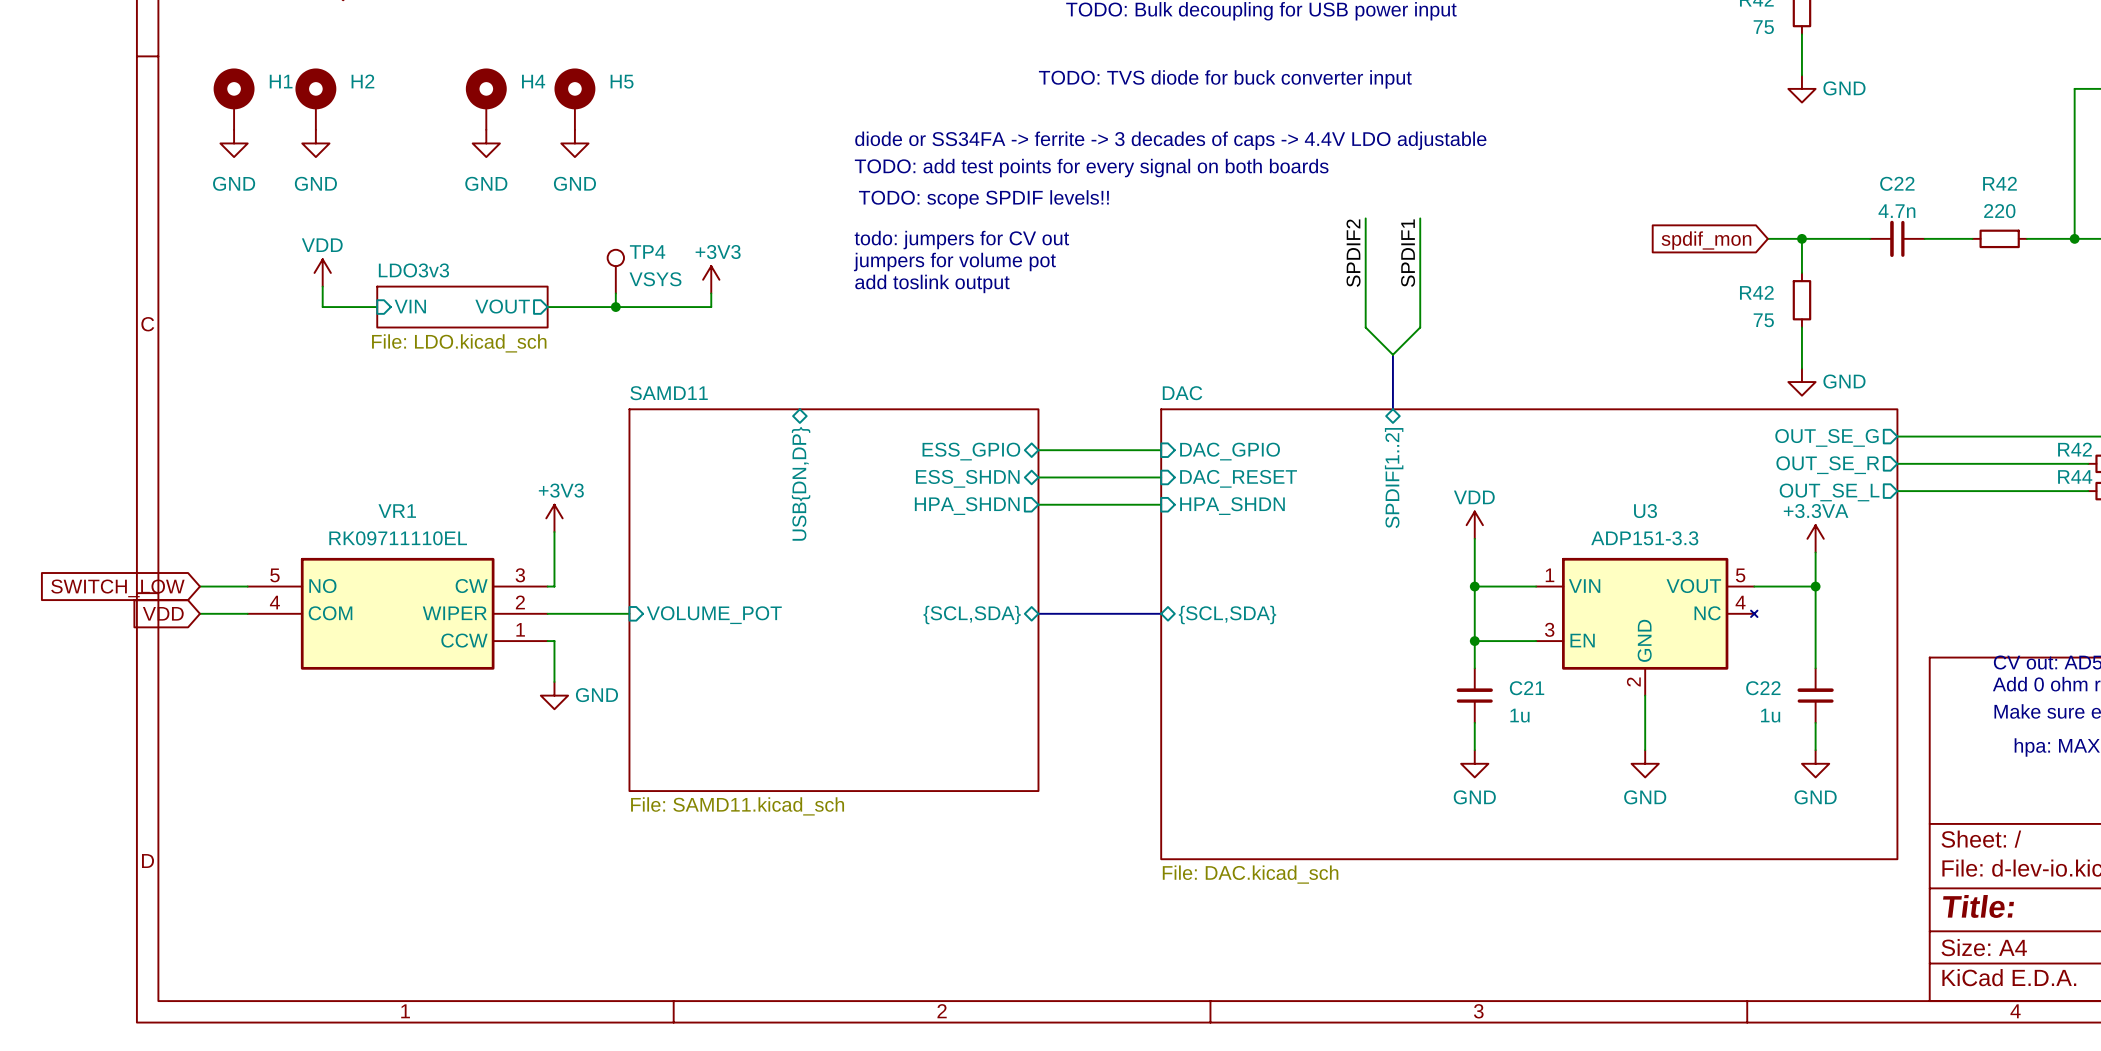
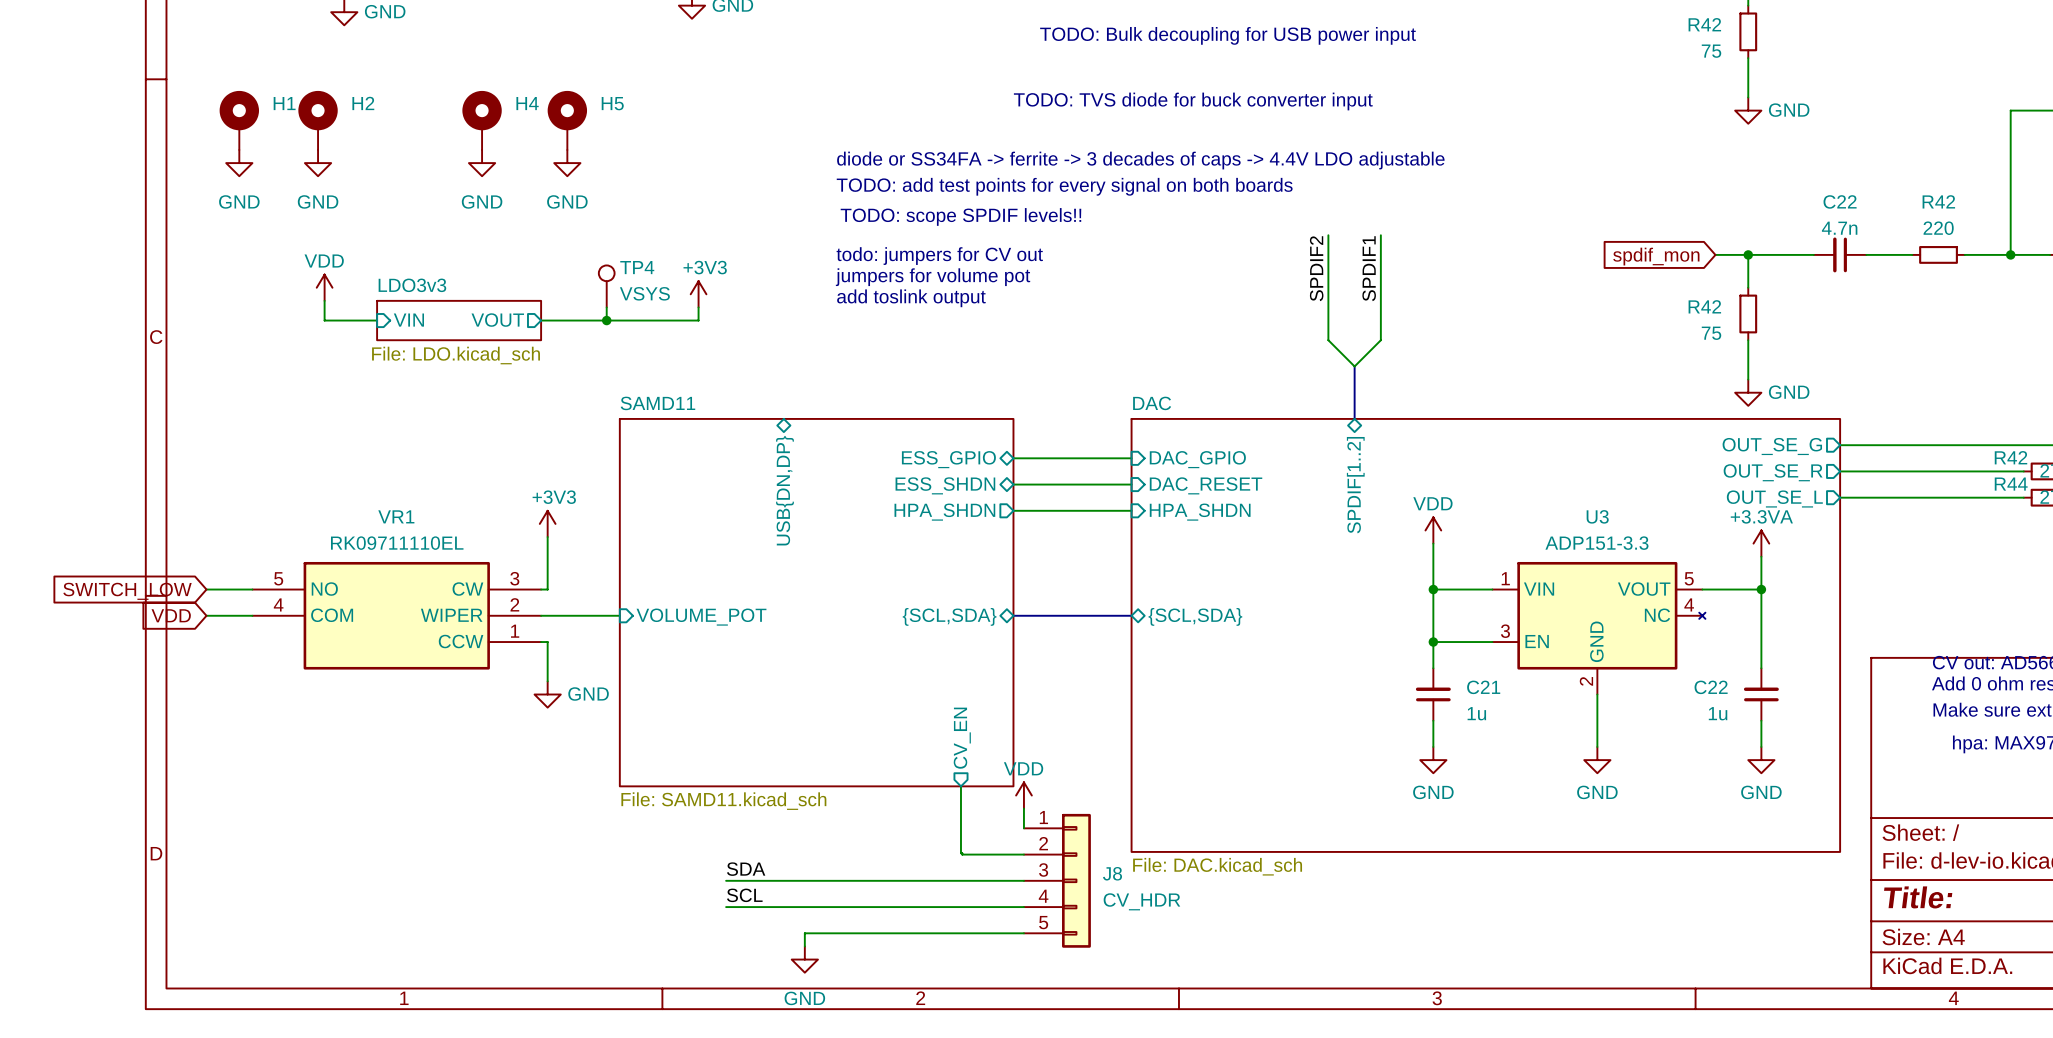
sheet pin: none -> CV_EN (962, 738)
wire: none -> (960, 786) (960, 853) (1023, 854)
power symbol: none -> VDD (1023, 795)
wire: none -> (1023, 808) (1023, 828)
label: none -> SDA (746, 869)
wire: none -> (726, 880) (1023, 880)
J8: none -> CV_HDR (1057, 880)
label: none -> SCL (744, 895)
wire: none -> (726, 907) (1023, 907)
wire: none -> (1023, 933) (804, 933) (804, 946)
power symbol: none -> GND (804, 959)

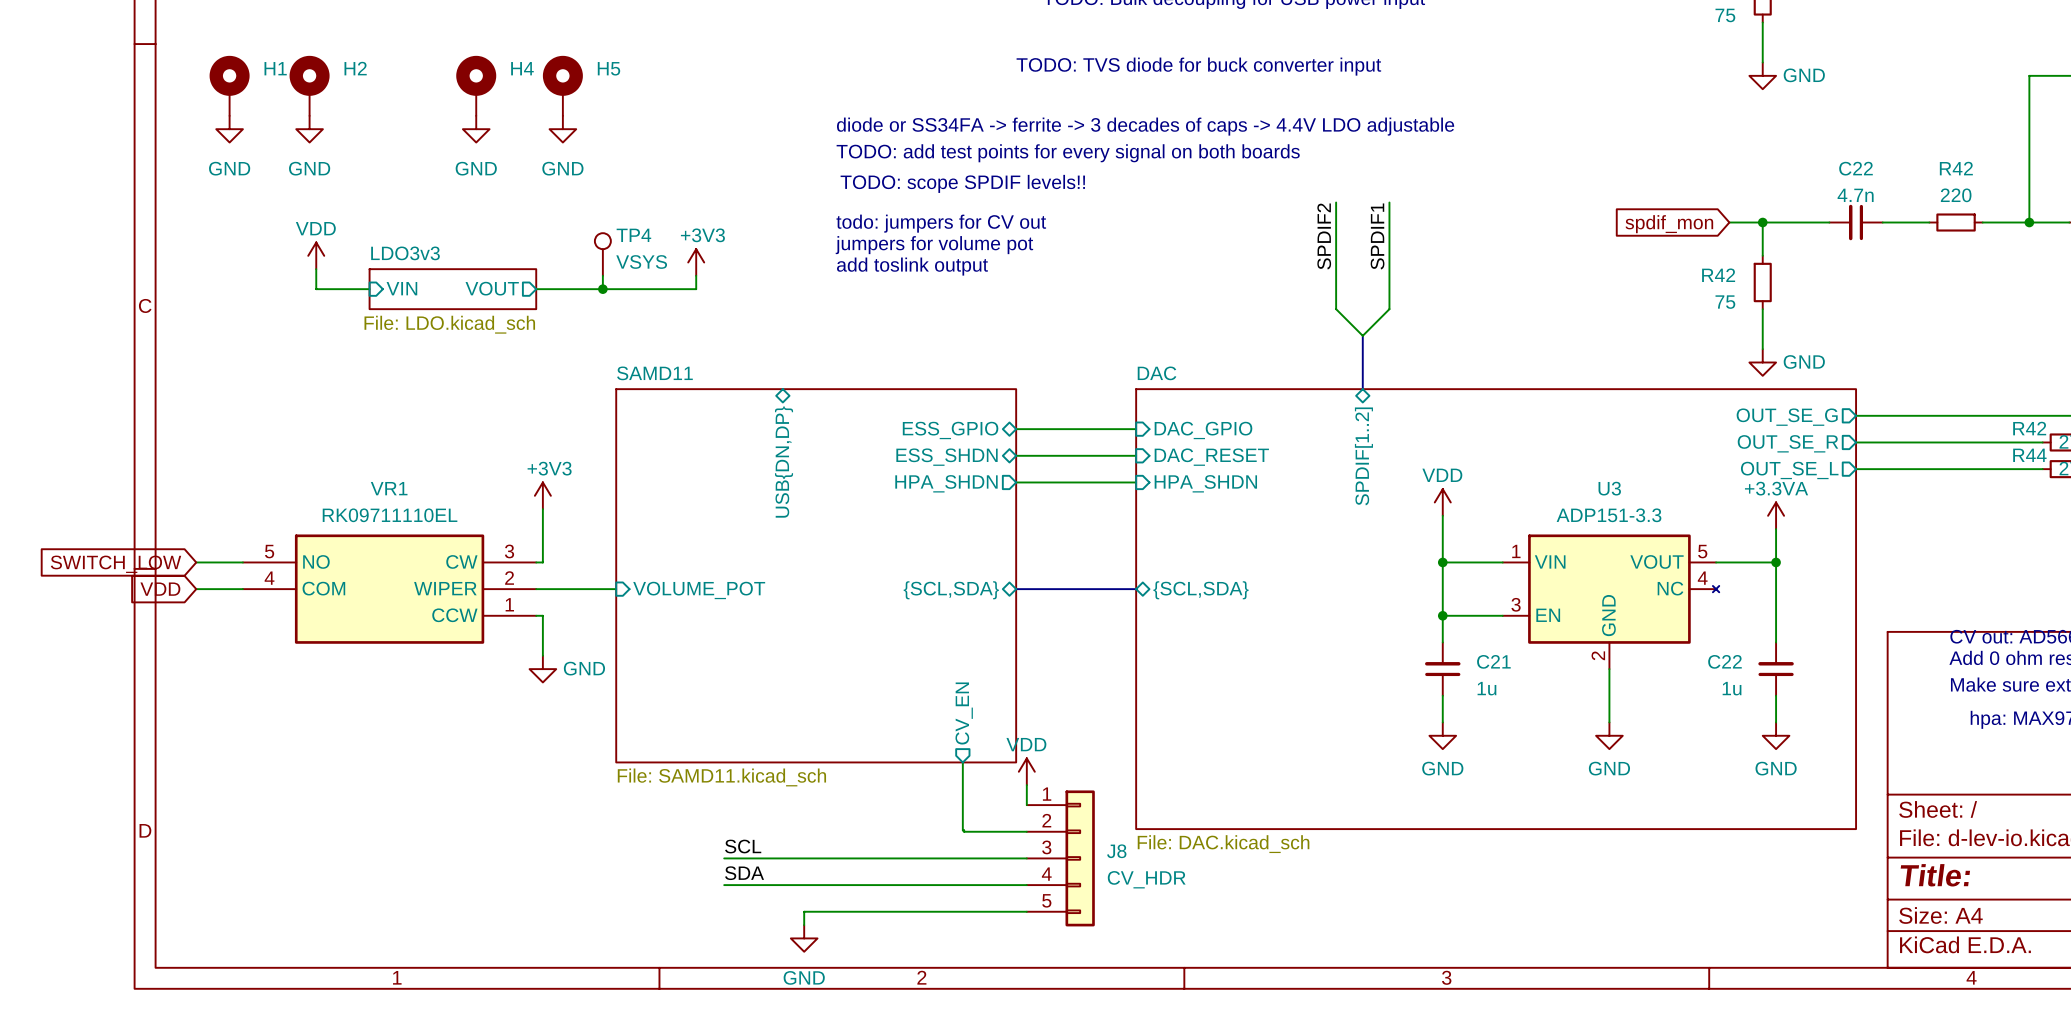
label: SDA (746, 869) -> SCL (743, 846)
label: SCL (744, 895) -> SDA (744, 873)

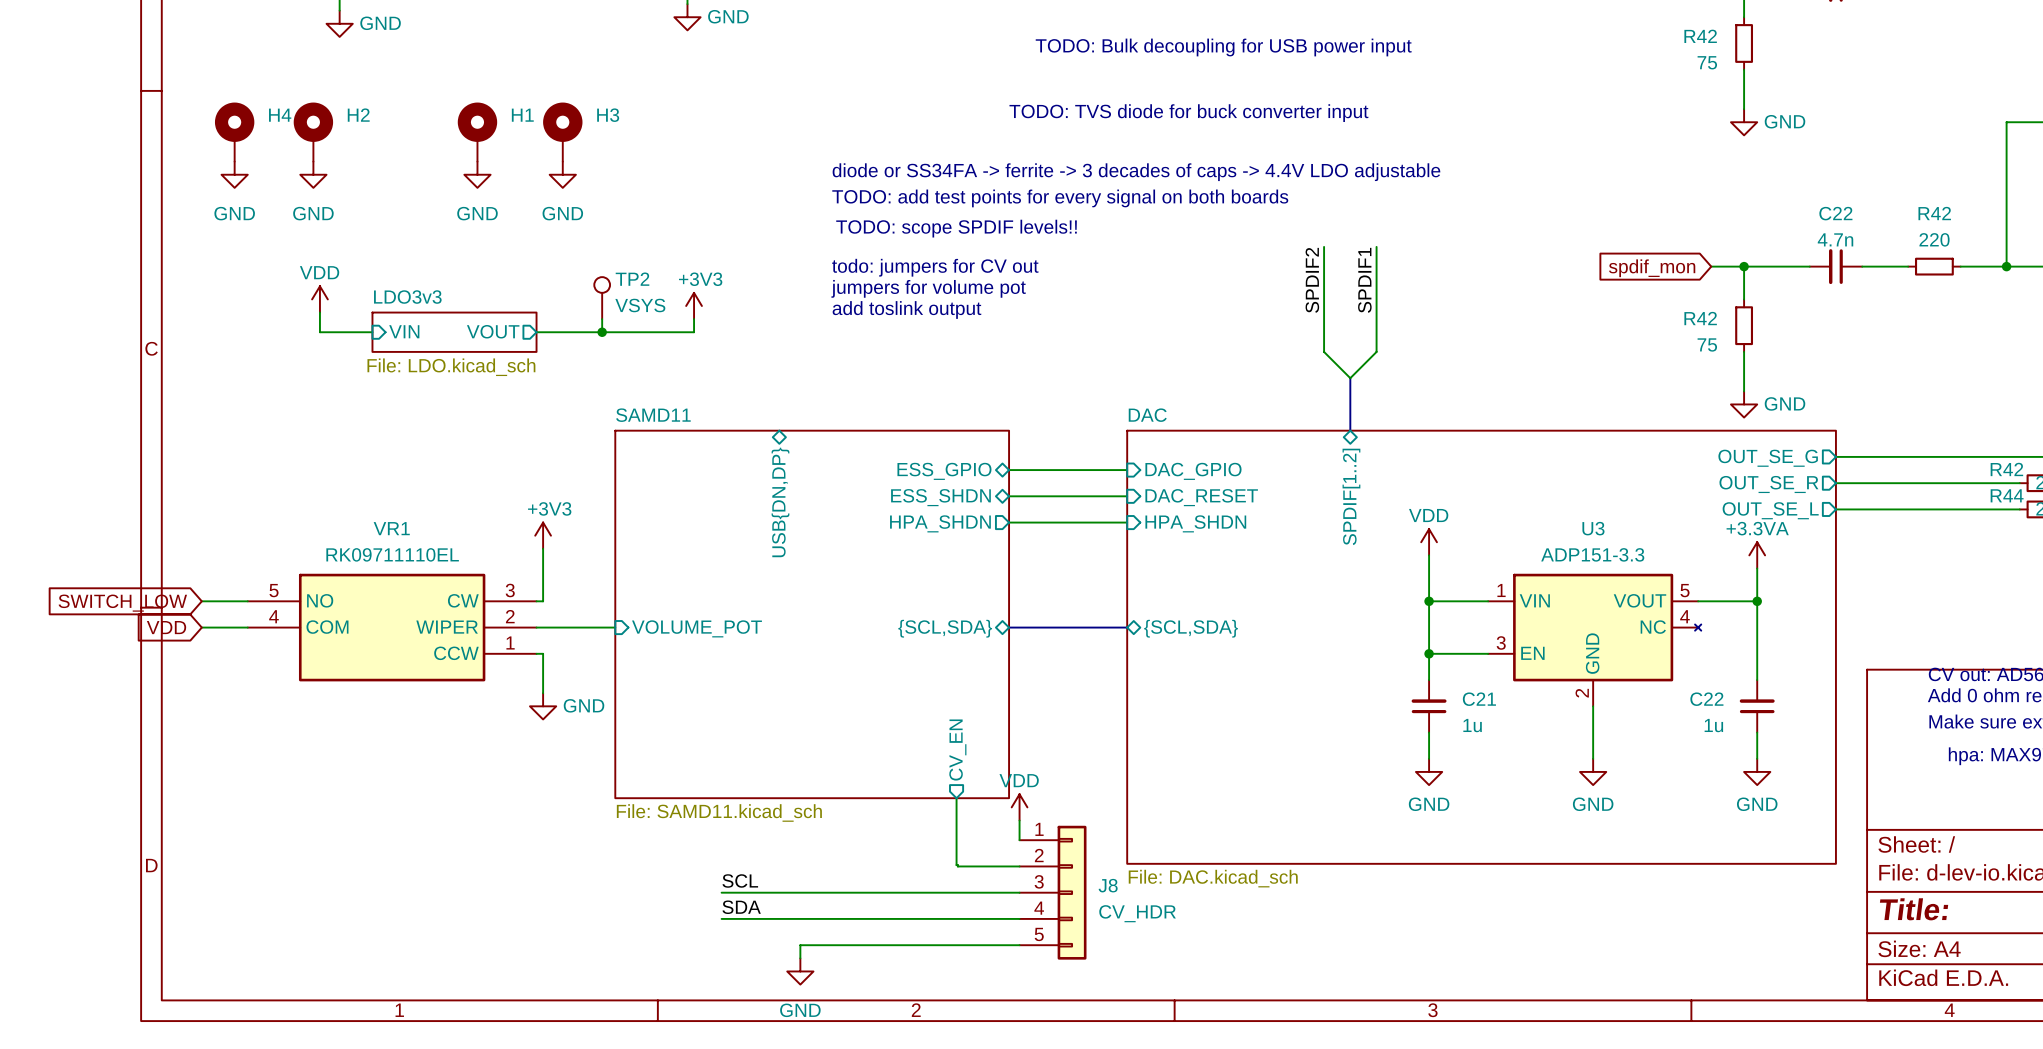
H1 name: H1 (275, 68) -> H4 (280, 115)
H4 name: H4 (522, 68) -> H1 (522, 115)
H5 name: H5 (608, 68) -> H3 (608, 115)
TP4 name: TP4 (633, 235) -> TP2 (632, 279)

